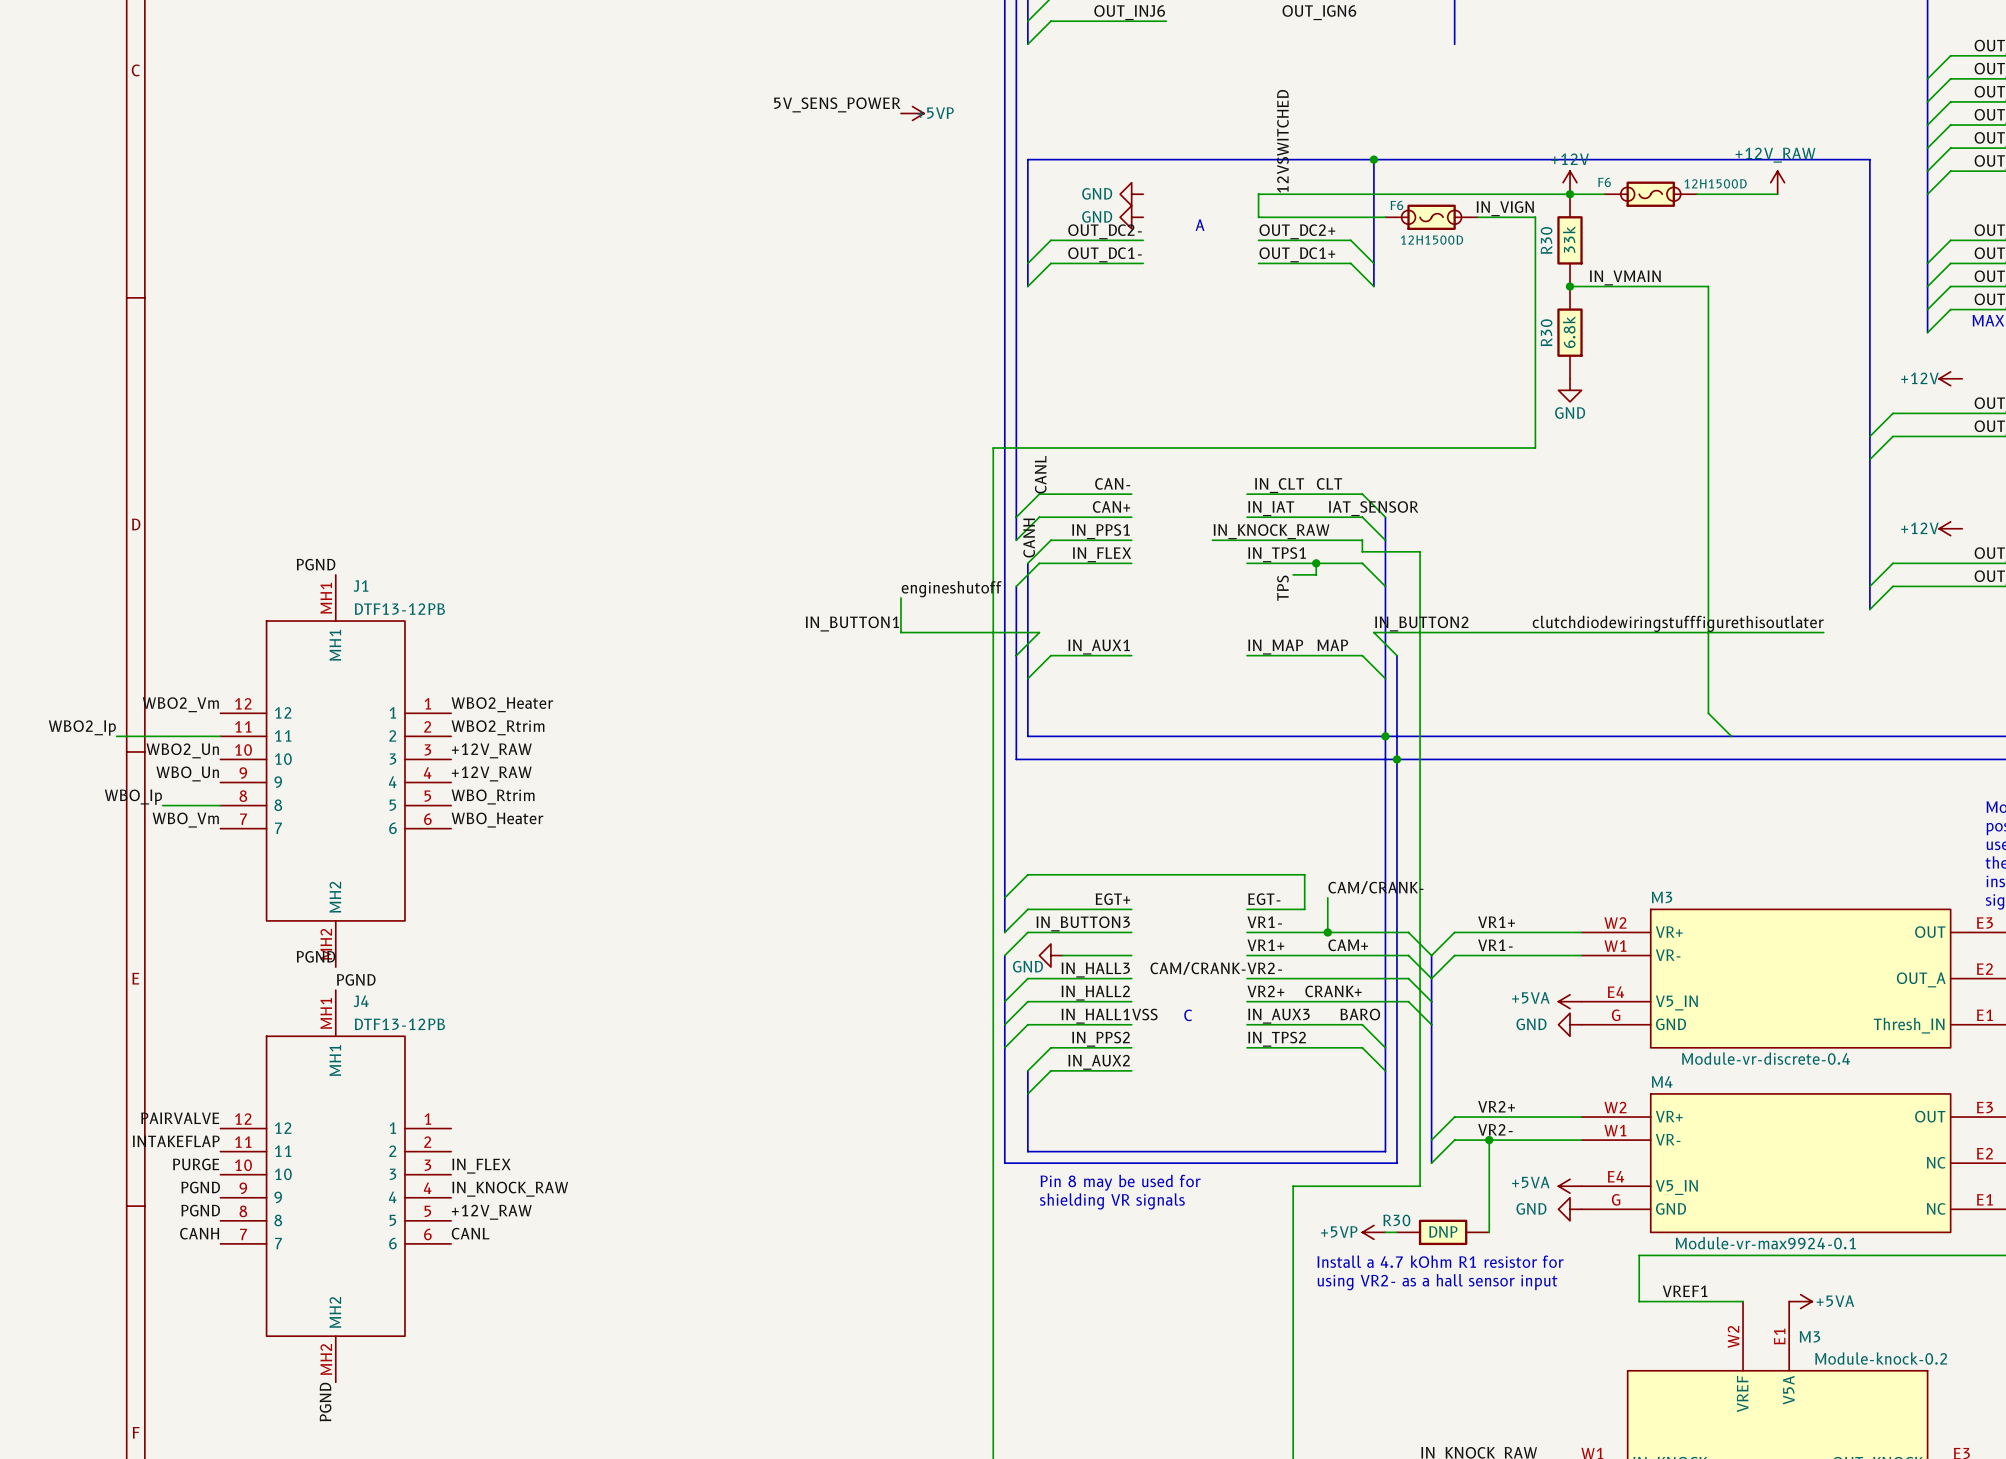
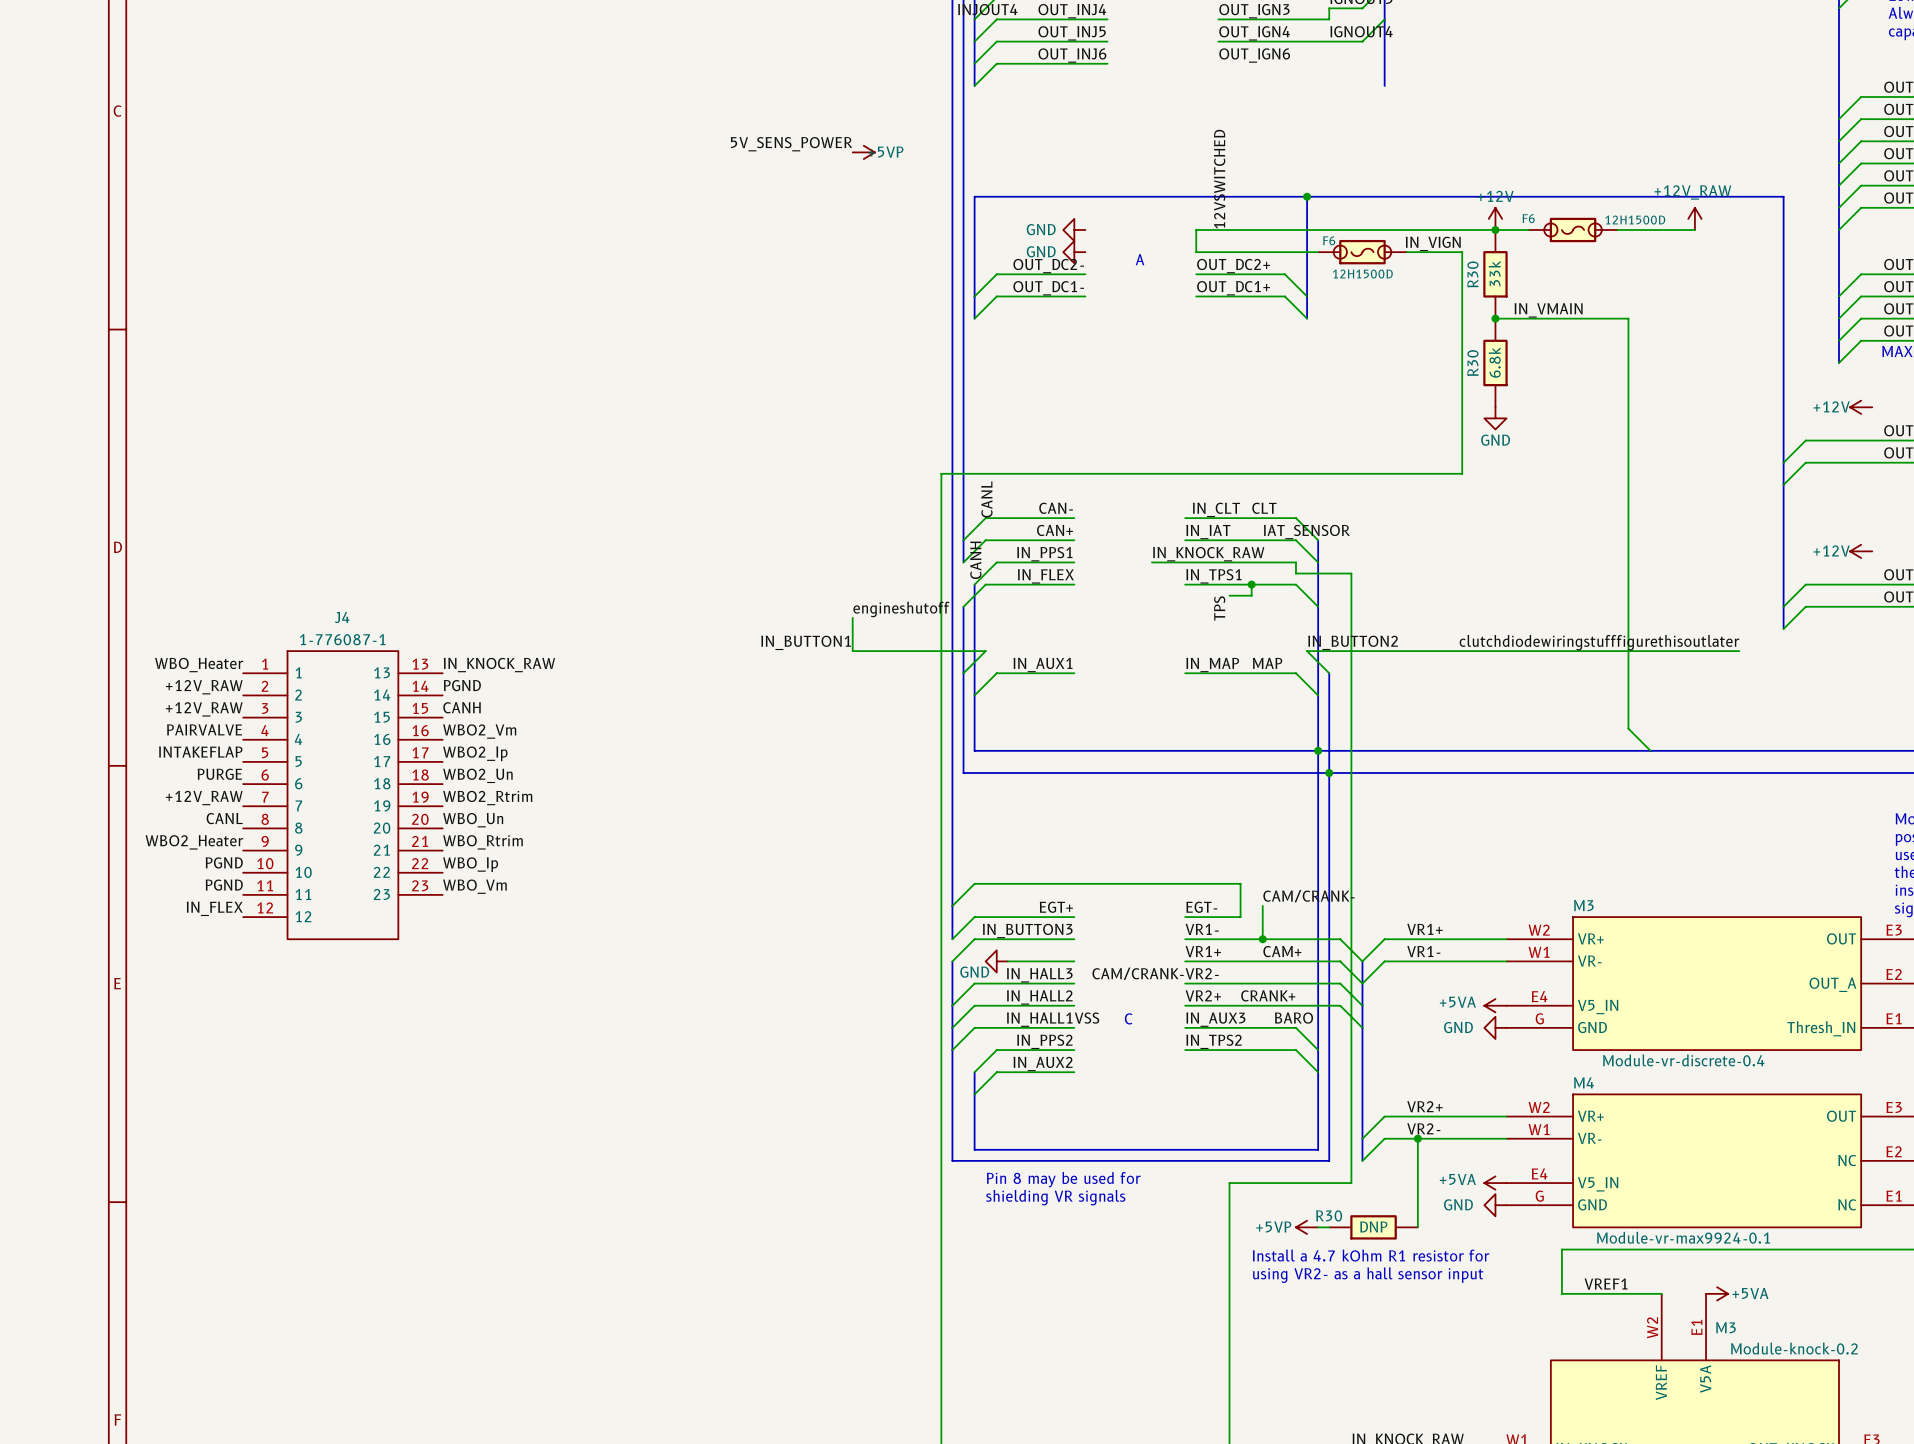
label: PGND (316, 564) -> none
label: none -> WBO_Heater (199, 665)
label: none -> IN_KNOCK_RAW (499, 665)
label: none -> PGND (462, 685)
label: none -> +12V_RAW (204, 687)
label: none -> CANH (462, 707)
label: none -> +12V_RAW (204, 709)
label: WBO2_Vm (180, 704) -> none
label position: WBO2_Heater (502, 704) -> WBO2_Heater (194, 842)
label: none -> PAIRVALVE (204, 729)
label: none -> WBO2_Vm (479, 731)
label: WBO2_Ip (82, 727) -> none
label position: WBO2_Rtrim (498, 727) -> WBO2_Rtrim (487, 798)
wire: (116, 736) (220, 736) -> none
label: none -> INTAKEFLAP (200, 752)
label: none -> WBO2_Ip (475, 753)
label: WBO2_Un (182, 750) -> none
label: +12V_RAW (491, 750) -> none
label: none -> PURGE (219, 774)
label: none -> WBO2_Un (477, 775)
J1: DTF13-12PB (335, 770) -> none
label: WBO_Un (187, 773) -> none
label: +12V_RAW (491, 773) -> none
label: none -> +12V_RAW (204, 798)
label: WBO_Ip (133, 797) -> none
label position: WBO_Rtrim (493, 797) -> WBO_Rtrim (482, 842)
wire: (162, 805) (220, 805) -> none
label: none -> CANL (224, 818)
label: none -> WBO_Un (473, 820)
label: WBO_Vm (185, 820) -> none
label: WBO_Heater (497, 820) -> none
label: none -> PGND (224, 862)
label: none -> WBO_Ip (470, 864)
label: none -> PGND (224, 885)
label: none -> WBO_Vm (474, 886)
label: none -> IN_FLEX (214, 908)
label: PGND (316, 956) -> none
label: PGND (356, 979) -> none
J4 symbol: [220, 990, 452, 1383] -> [243, 650, 443, 940]
J4 name position: J4 (361, 1001) -> J4 (342, 617)
J4 value: DTF13-12PB (399, 1024) -> 1-776087-1 (342, 639)
label: PAIRVALVE (180, 1118) -> none
label: INTAKEFLAP (176, 1141) -> none
label: PURGE (196, 1164) -> none
label: IN_FLEX (481, 1166) -> none
label: PGND (200, 1187) -> none
label: IN_KNOCK_RAW (510, 1189) -> none
label: PGND (200, 1210) -> none
label: +12V_RAW (491, 1212) -> none
label: CANH (199, 1233) -> none
label: CANL (470, 1233) -> none
label: PGND (325, 1402) -> none

